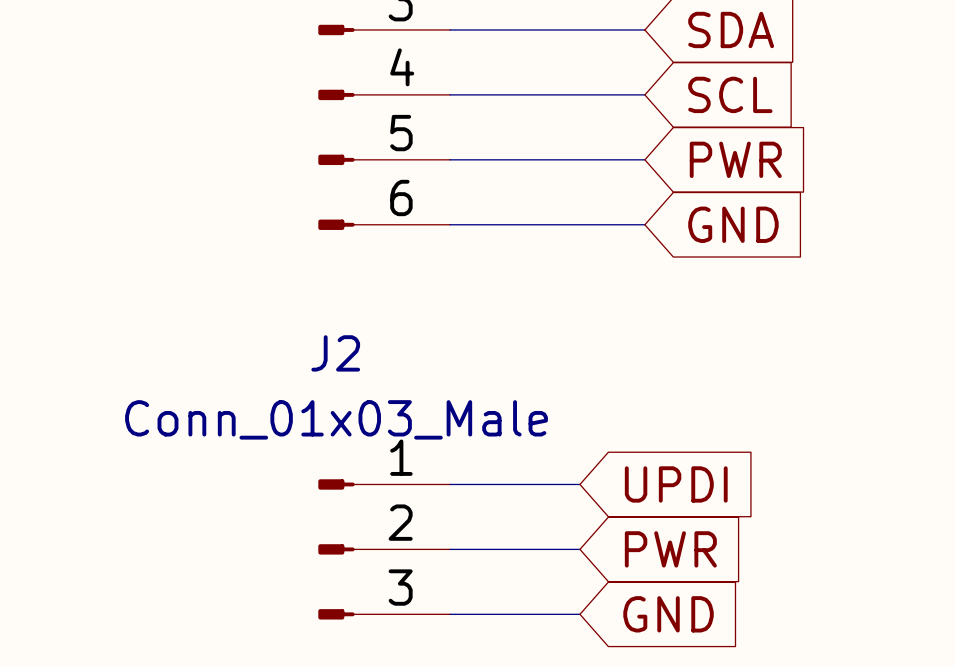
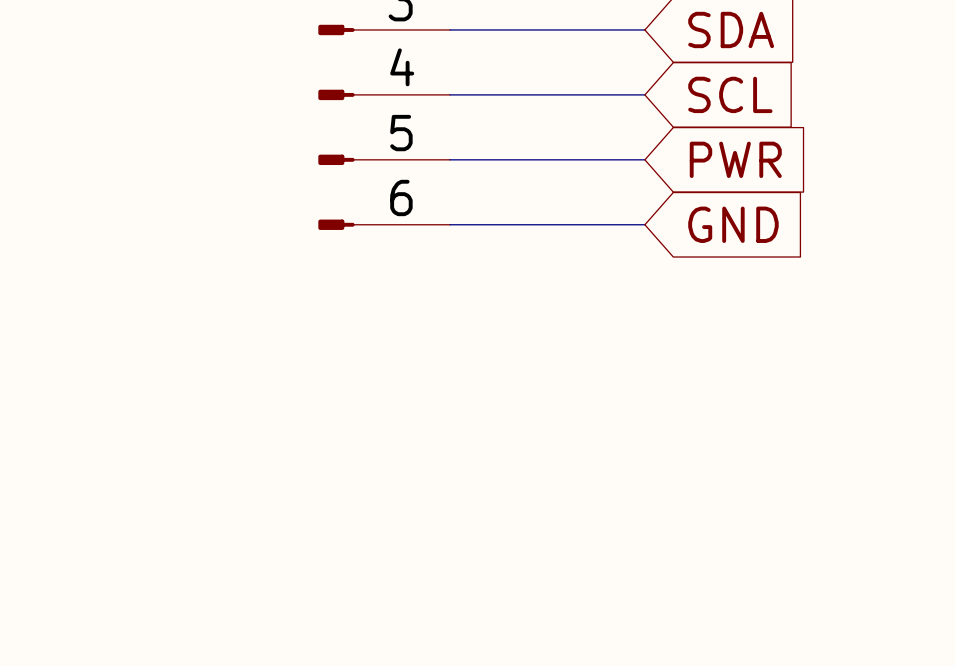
wire: (450, 484) (579, 484) -> none
global label: UPDI (676, 484) -> none
J2: Conn_01x03_Male (384, 549) -> none
wire: (450, 549) (579, 549) -> none
global label: PWR (670, 549) -> none
wire: (450, 614) (579, 614) -> none
global label: GND (668, 614) -> none

